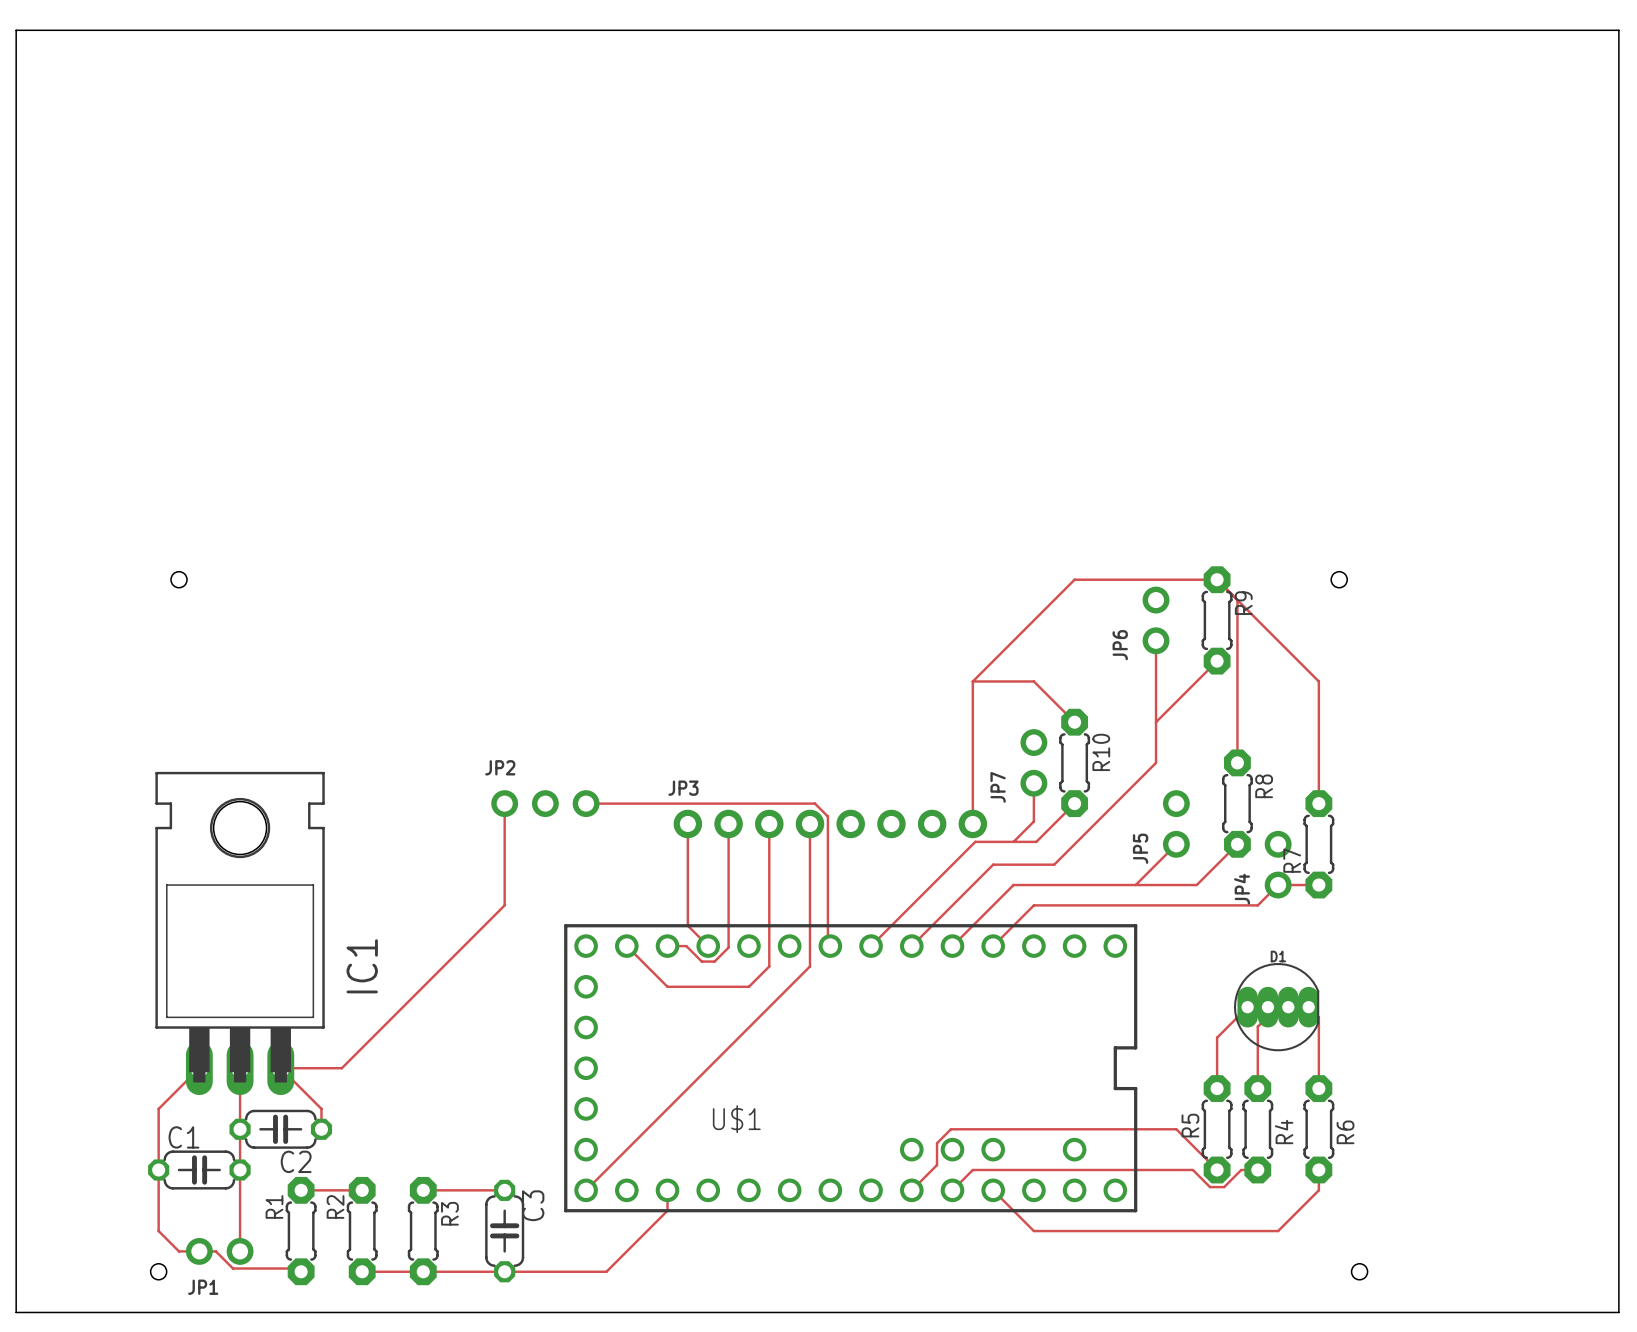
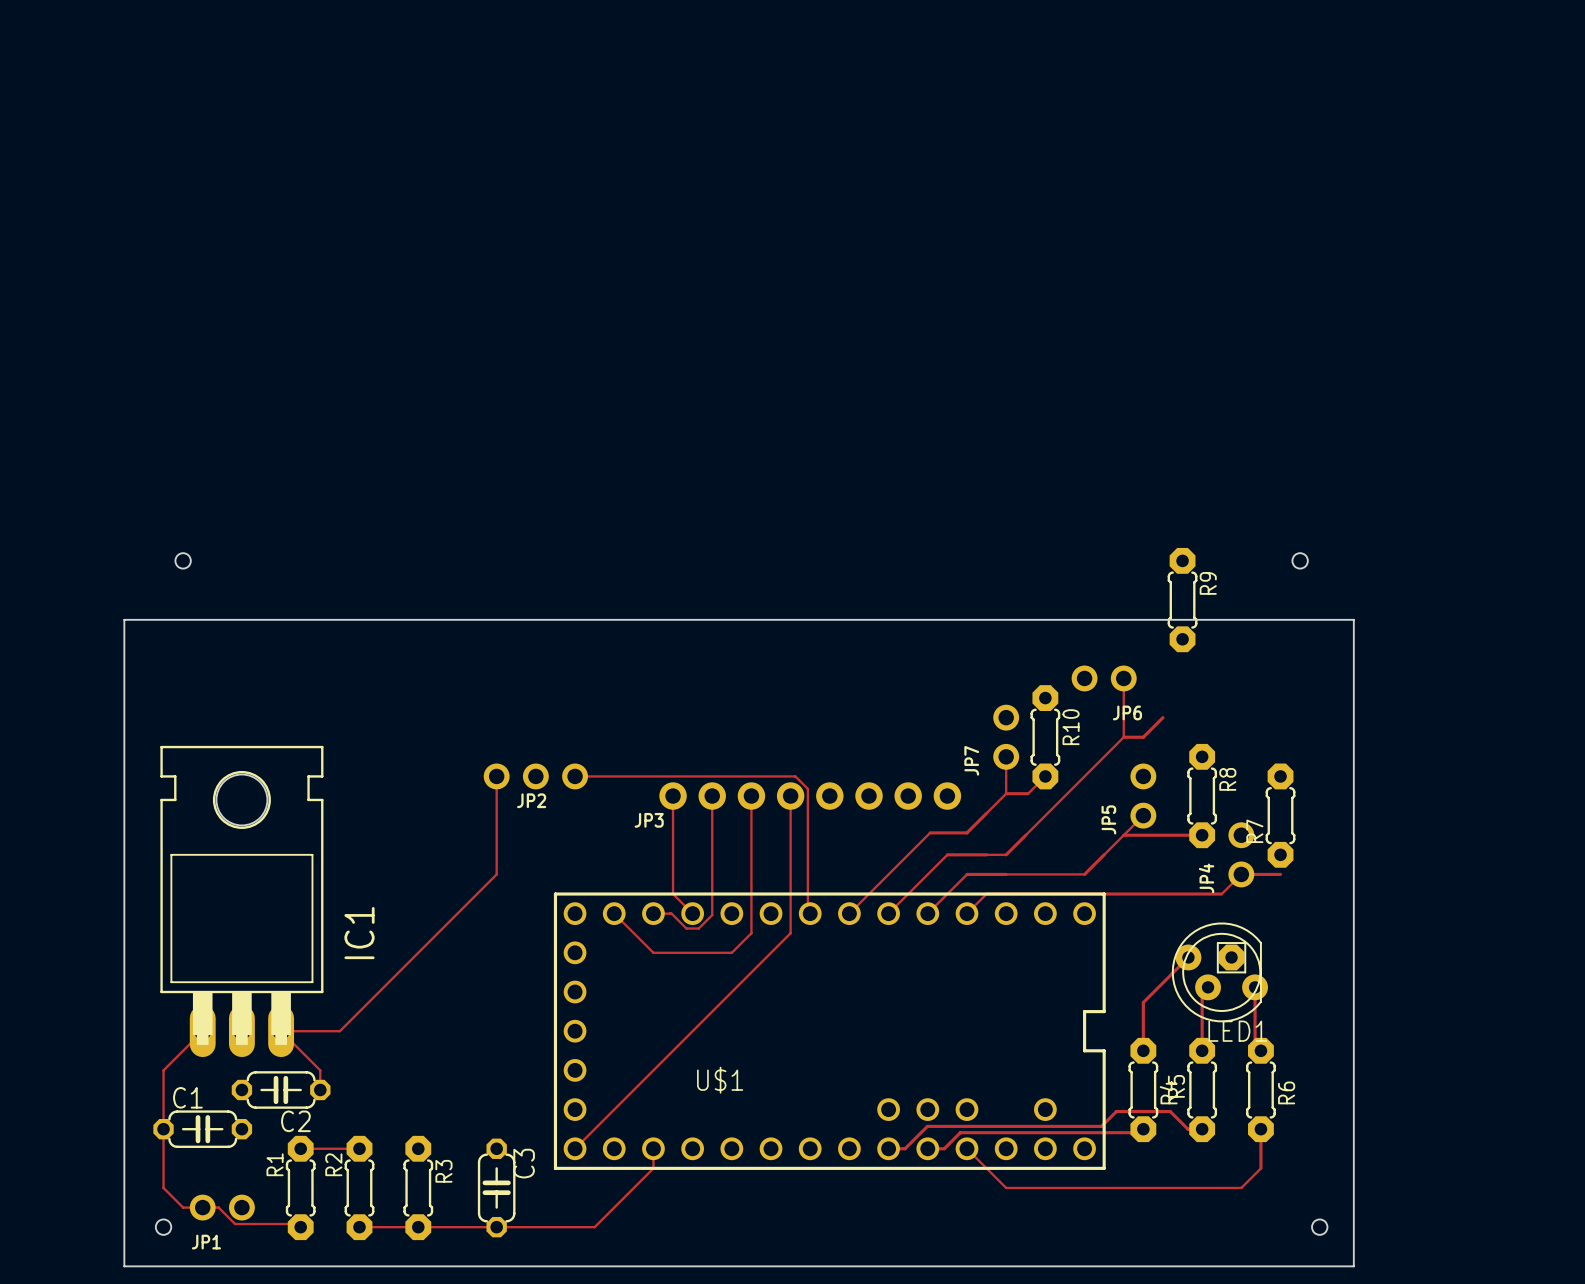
track: (1237, 600) (1237, 762) -> none
JP6 rotation: 0° (1156, 620) -> 90° clockwise (1104, 678)
JP6 position: (1156, 620) -> (1104, 678)
track: (1156, 640) (1156, 701) -> none
JP6 name position: JP6 (1120, 645) -> JP6 (1127, 712)
track: (1217, 661) (1156, 722) -> none
track: (972, 681) (972, 823) -> none
track: (972, 681) (1074, 579) (1217, 579) (1318, 681) (1318, 803) -> none
track: (972, 681) (1033, 681) (1074, 722) -> none
track: none -> (1162, 717) (1143, 737) (1123, 737)
JP2 name position: JP2 (500, 767) -> JP2 (531, 800)
JP3 name position: JP3 (683, 788) -> JP3 (649, 820)
R8 position: (1237, 803) -> (1202, 796)
track: none -> (1006, 793) (1028, 793)
track: (1056, 821) (1036, 841) (975, 841) (954, 862) -> (986, 813) (966, 832) (930, 832)
track: (1237, 844) (1196, 885) (1033, 885) -> none
track: (1054, 864) (993, 864) (972, 885) -> (1025, 835) (1006, 854)
track: none -> (1123, 835) (1202, 835)
JP4 position: (1278, 864) -> (1241, 854)
track: (1013, 885) (993, 905) -> (986, 854) (947, 854)
track: (1318, 885) (1278, 885) (1257, 905) (1115, 905) -> (1104, 854) (1084, 874)
track: (1033, 905) (1013, 925) -> (1006, 874) (966, 874)
track: none -> (1280, 874) (1241, 874) (1221, 894) (986, 894)
track: none -> (1188, 957) (1143, 1002) (1143, 1050)
track: (1247, 1007) (1217, 1037) (1217, 1088) -> none
LED1: none -> (1219, 972)
track: (1267, 1007) (1261, 1013) (1261, 1023) (1257, 1026) (1257, 1088) -> none
D1: (1276, 1007) -> none
track: (1308, 1007) (1318, 1017) (1318, 1088) -> none
track: none -> (1208, 987) (1202, 993) (1202, 1050)
track: none -> (1255, 987) (1255, 1044) (1260, 1050)
track: (240, 1068) (240, 1251) -> none
R5 position: (1217, 1129) -> (1202, 1089)
R4 position: (1257, 1129) -> (1143, 1089)
R6 position: (1318, 1129) -> (1260, 1089)
track: (1217, 1169) (1176, 1129) (950, 1129) (937, 1143) (937, 1165) (911, 1190) -> (1202, 1129) (1187, 1129) (1170, 1111) (1116, 1111) (1101, 1126) (927, 1126) (905, 1148) (888, 1148)
track: (1257, 1169) (1241, 1169) (1224, 1187) (1210, 1187) (1192, 1169) (972, 1169) (952, 1190) -> (1143, 1129) (1139, 1132) (960, 1132) (944, 1148) (927, 1148)
track: (1318, 1169) (1318, 1190) (1298, 1210) -> (1260, 1129) (1260, 1168)
track: (423, 1190) (504, 1190) -> none
board edge: (117, 1312) (16, 1312) (16, 30) (1618, 30) (1618, 1312) (1394, 1312) -> (124, 1266) (124, 619) (1353, 619) (1353, 1266)

